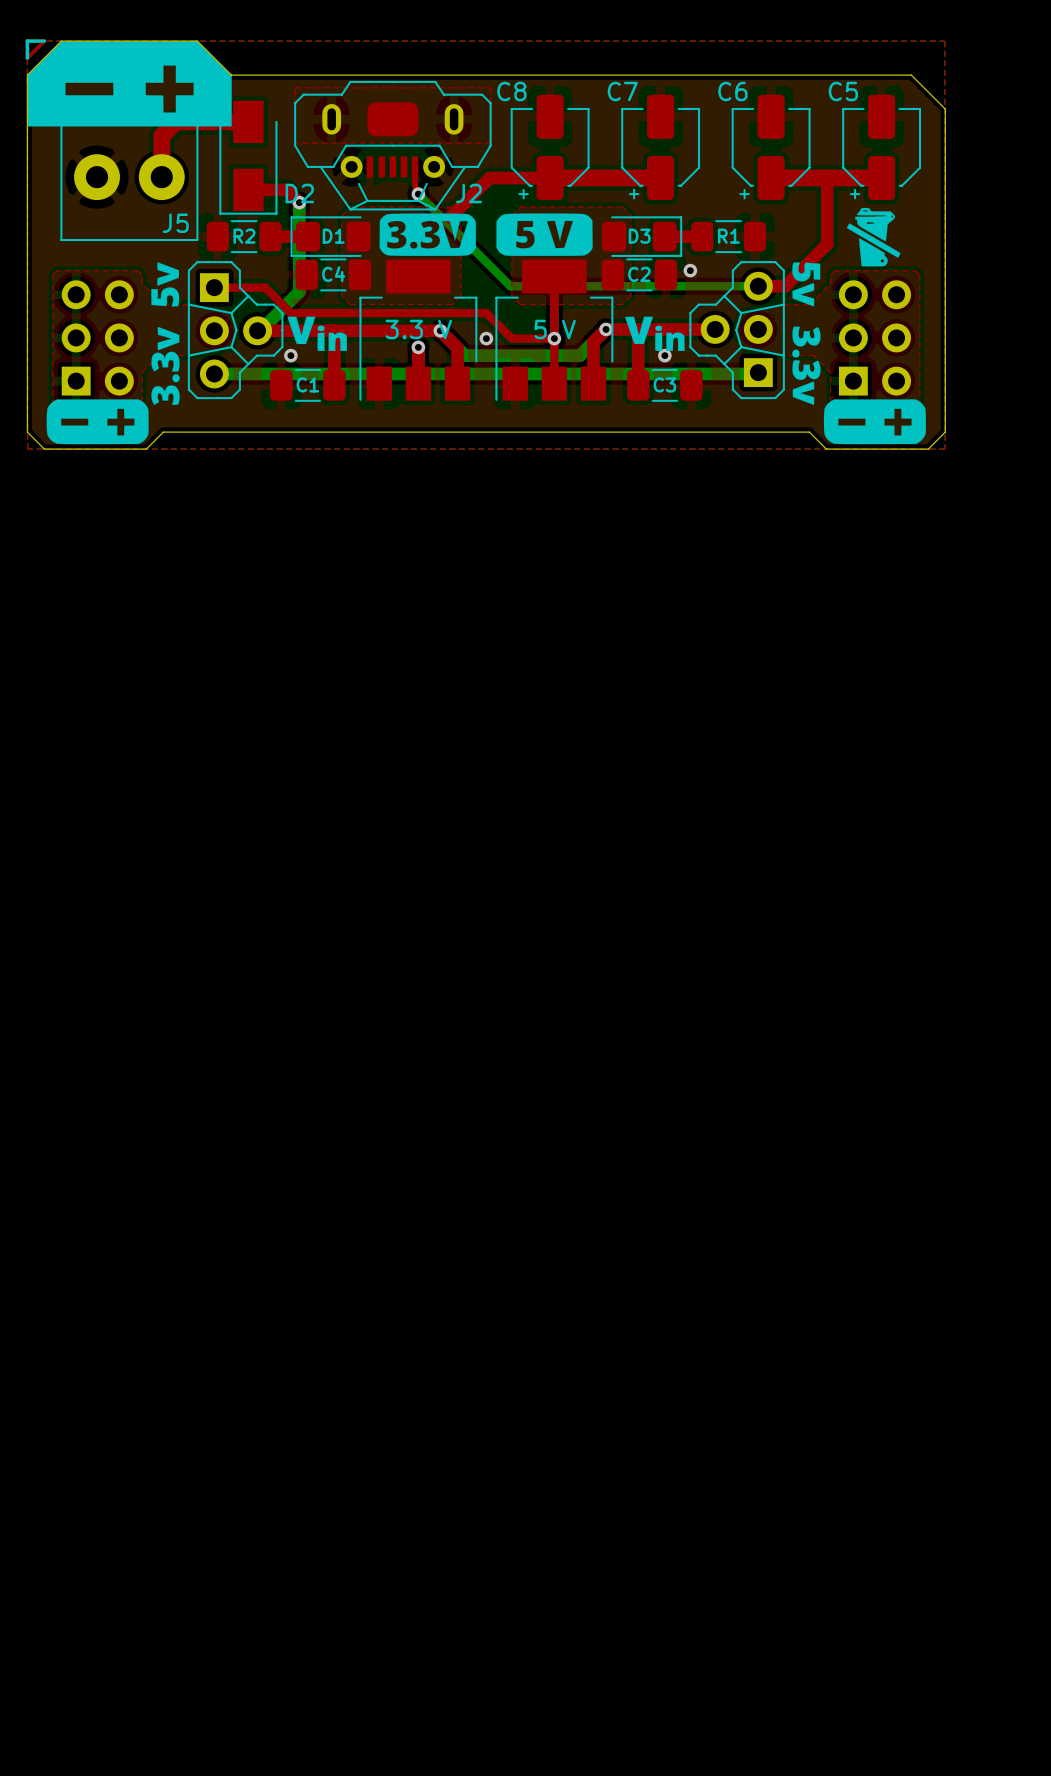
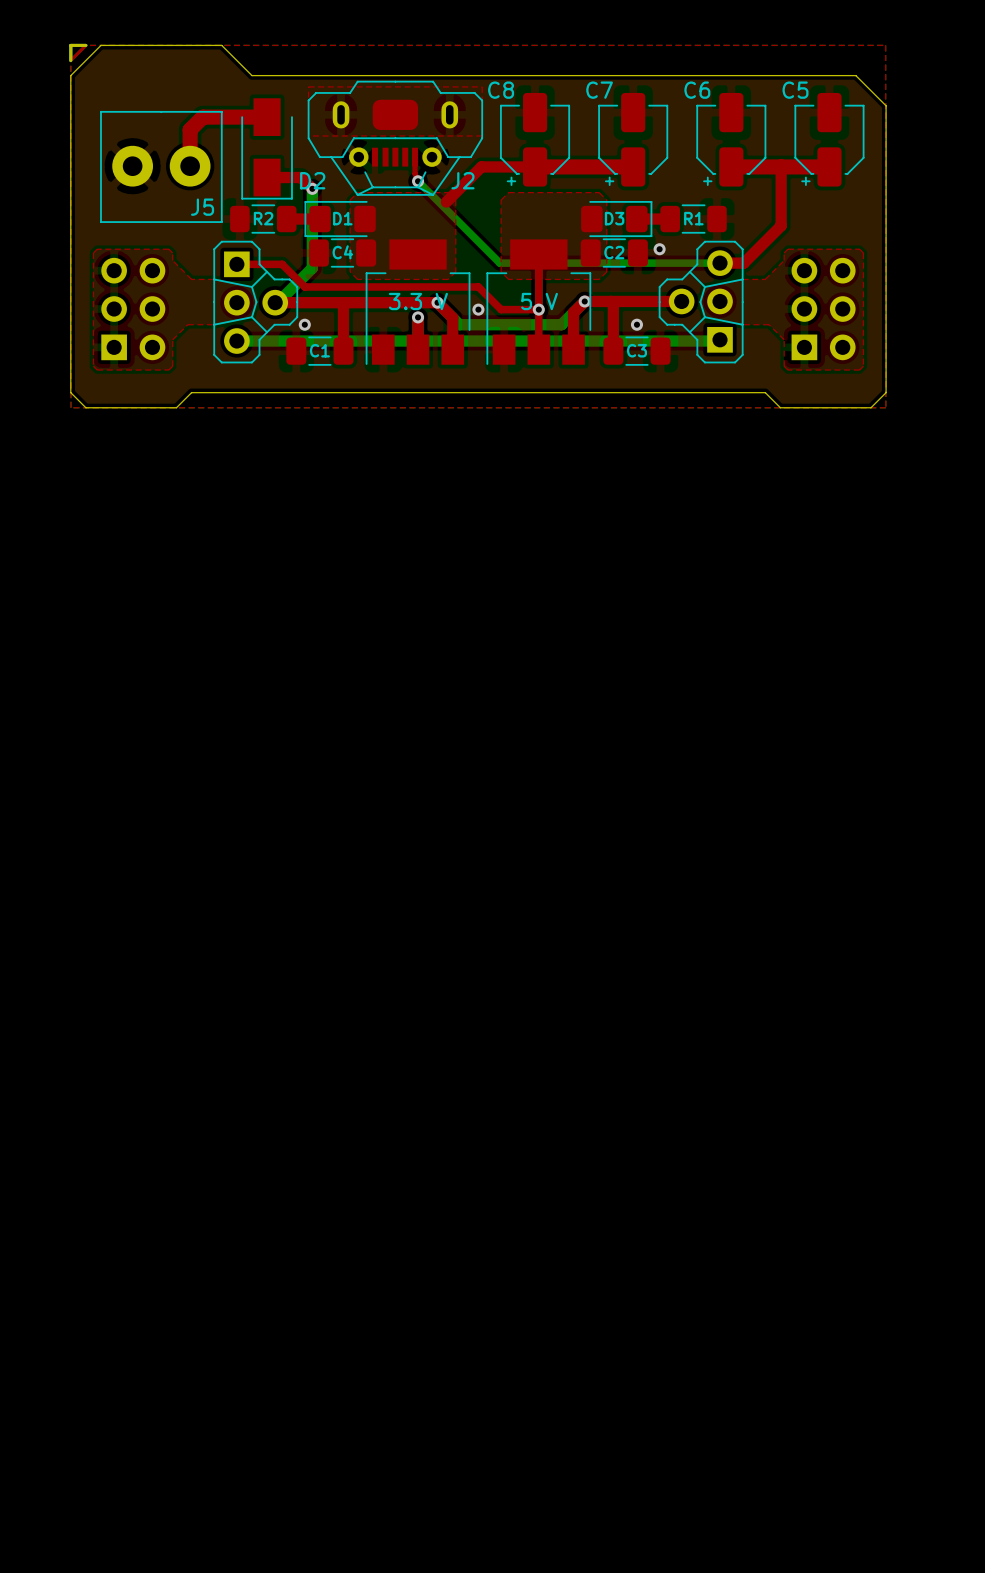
drawing: [27, 41, 926, 445] -> none
board edge: none -> (85, 45) (70, 45) (70, 60)

